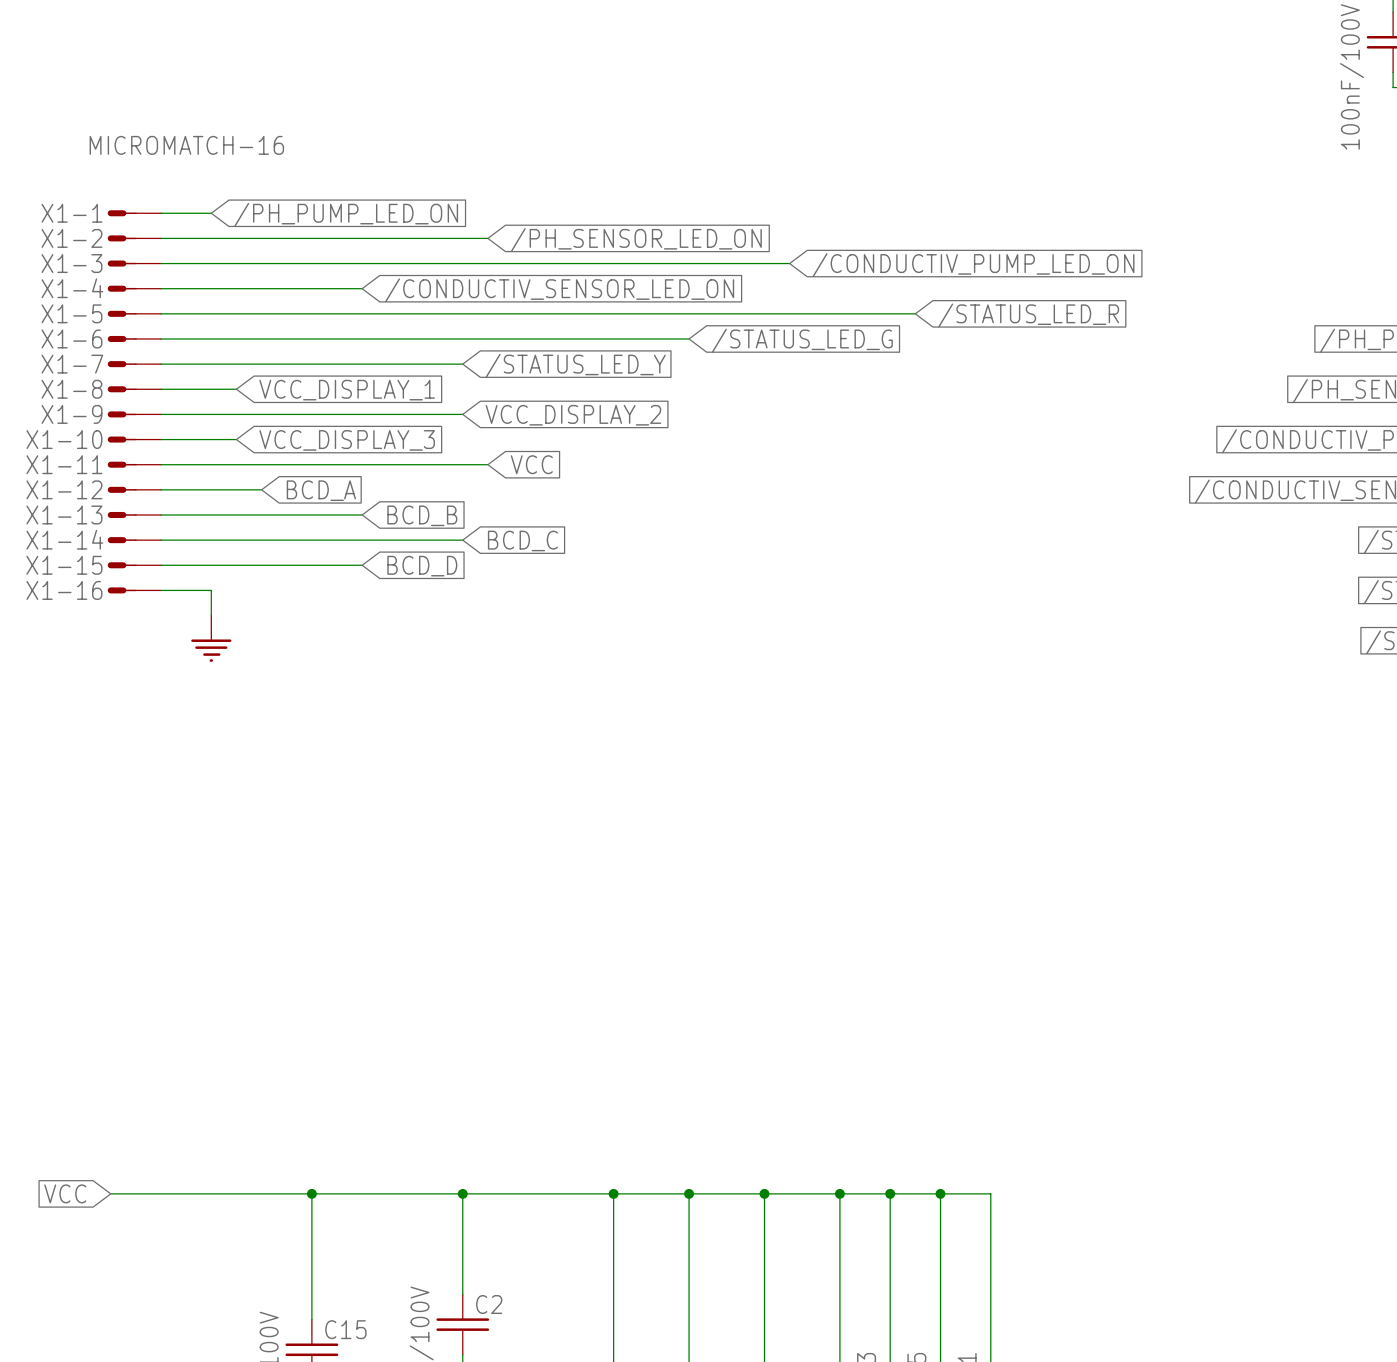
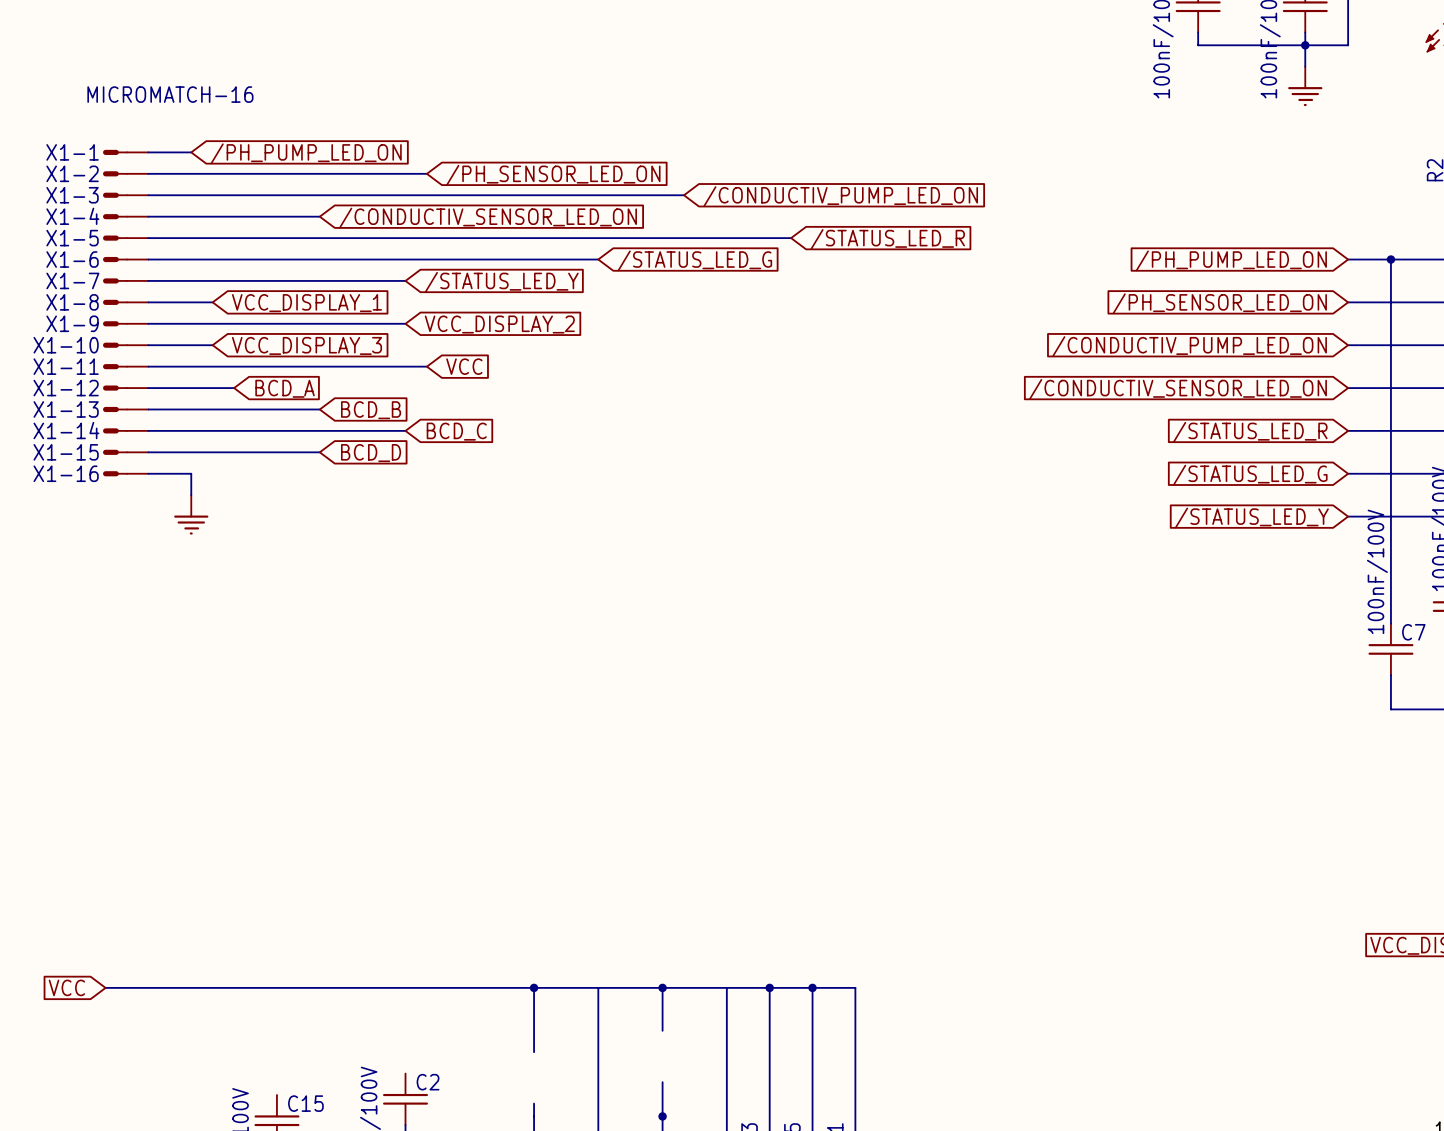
wire: (311, 1193) (311, 1319) -> none
junction: (311, 1193) -> none
wire: (462, 1193) (462, 1294) -> none
junction: (462, 1193) -> none
junction: (689, 1193) -> none
junction: (839, 1193) -> none
wire: (764, 1244) (764, 1304) -> none
wire: (613, 1269) (613, 1329) -> none
junction: none -> (662, 1116)

